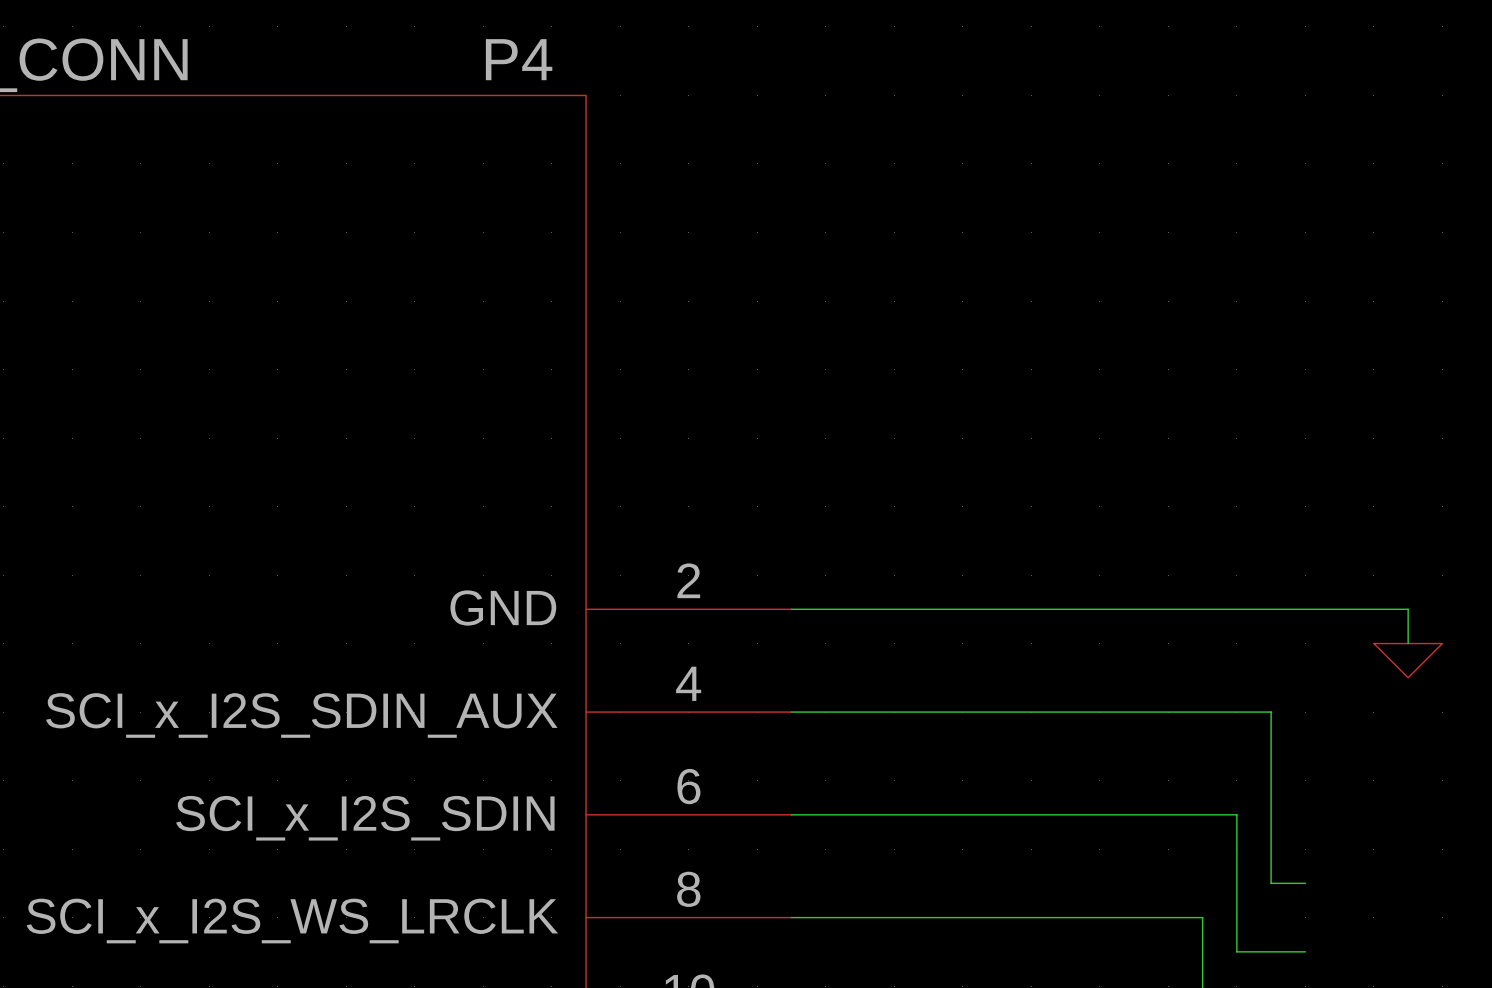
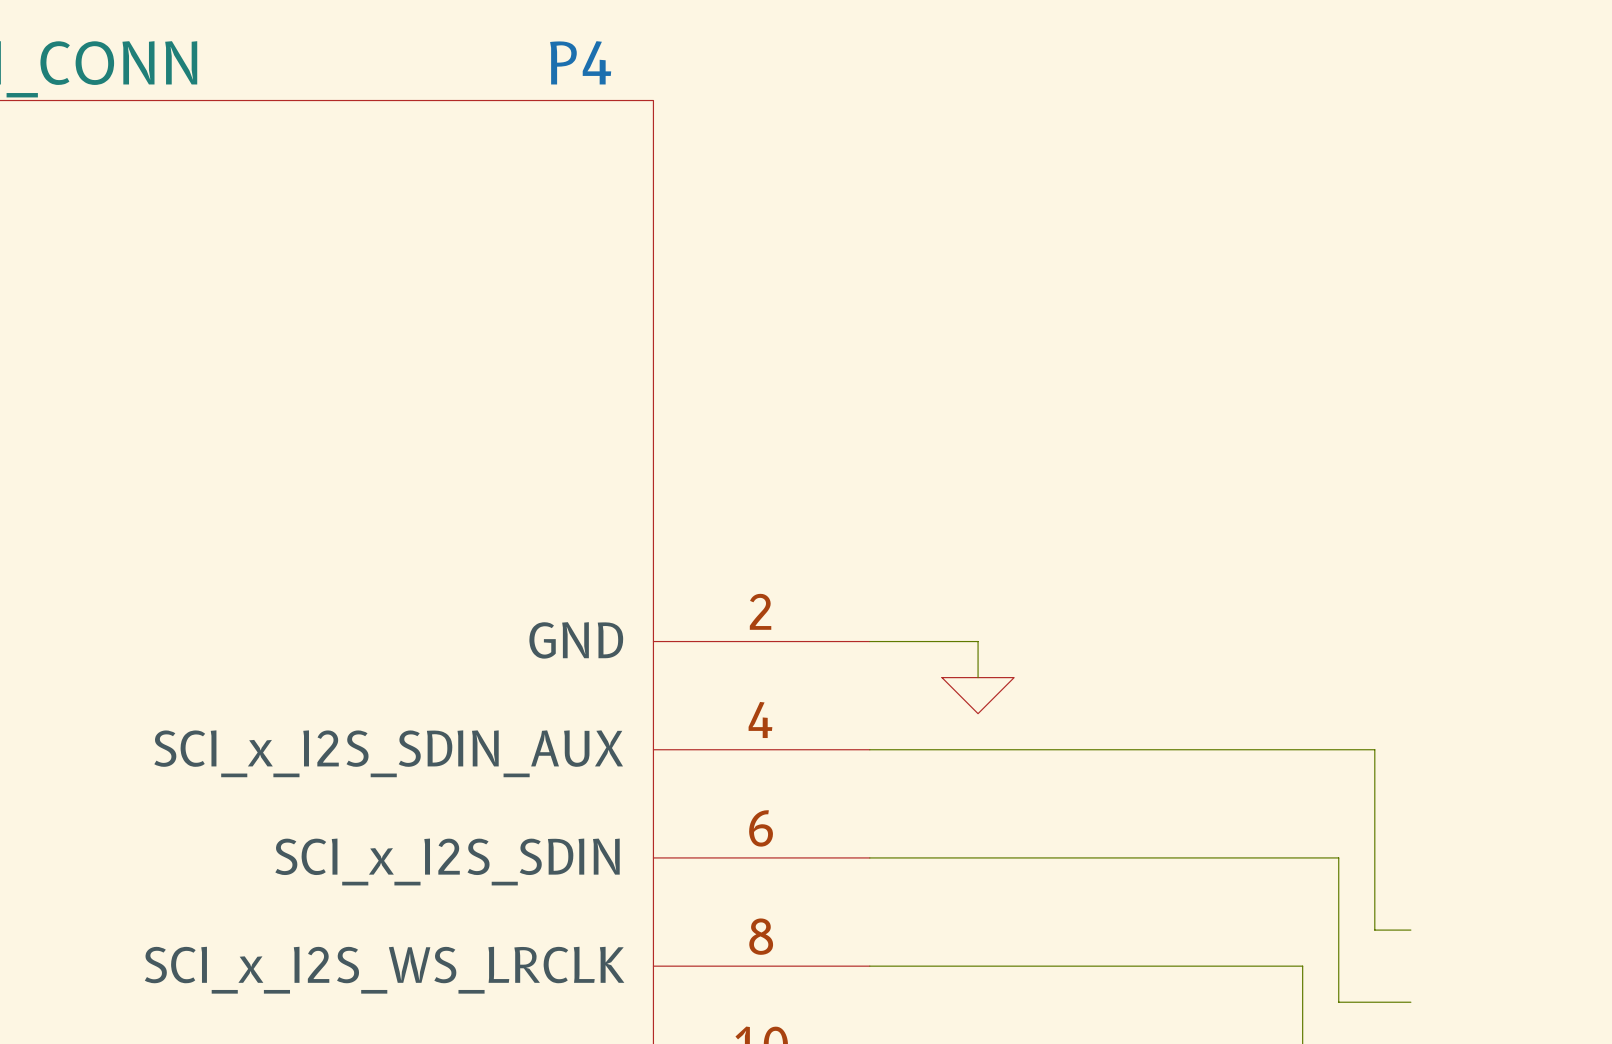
wire: (894, 609) (1408, 609) (1408, 643) -> (978, 641) (978, 677)
power symbol position: (1408, 660) -> (978, 695)

